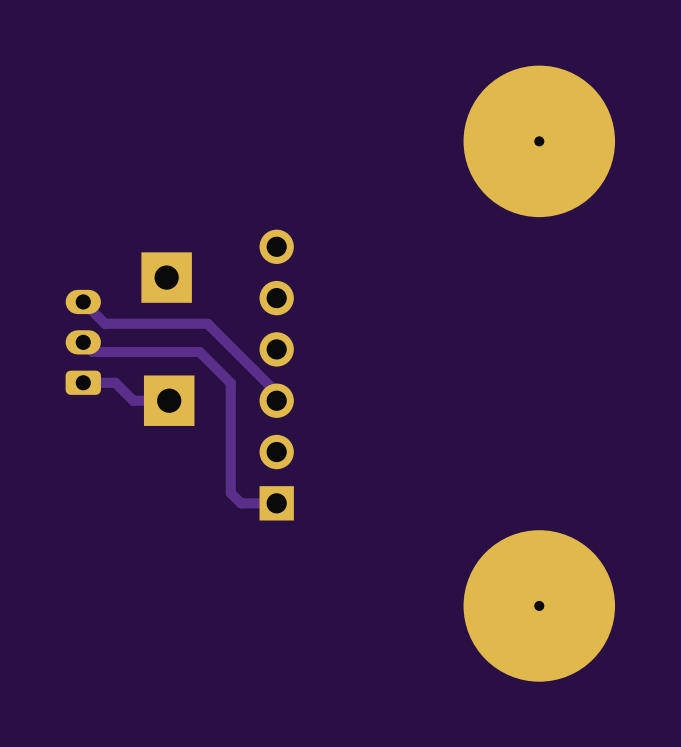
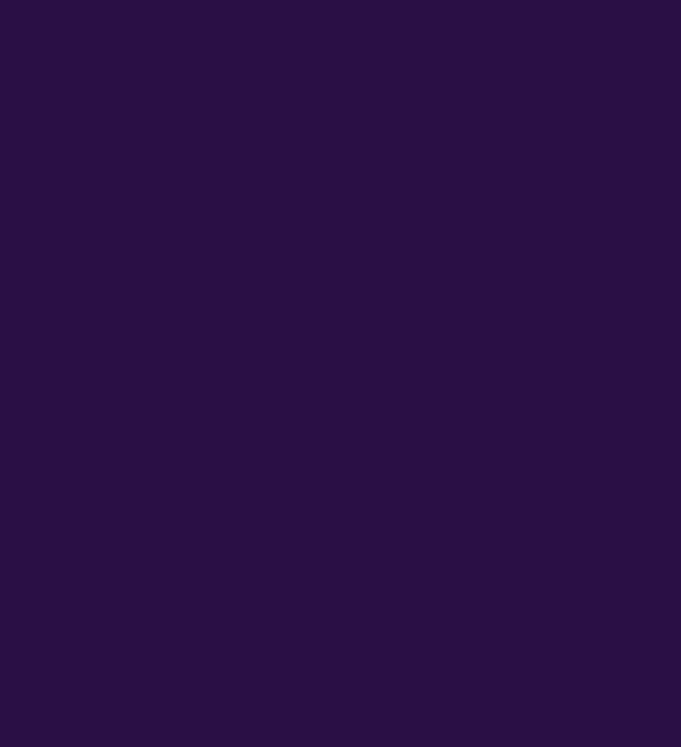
part: (539, 141) -> none
part: (166, 277) -> none
track: (83, 301) (105, 323) (207, 323) (276, 392) (276, 400) -> none
track: (83, 342) (92, 351) (199, 351) (230, 383) (230, 493) (241, 503) (276, 503) -> none
part: (83, 342) -> none
part: (276, 375) -> none
track: (83, 382) (115, 382) (133, 400) (169, 400) -> none
part: (169, 400) -> none
part: (539, 605) -> none

